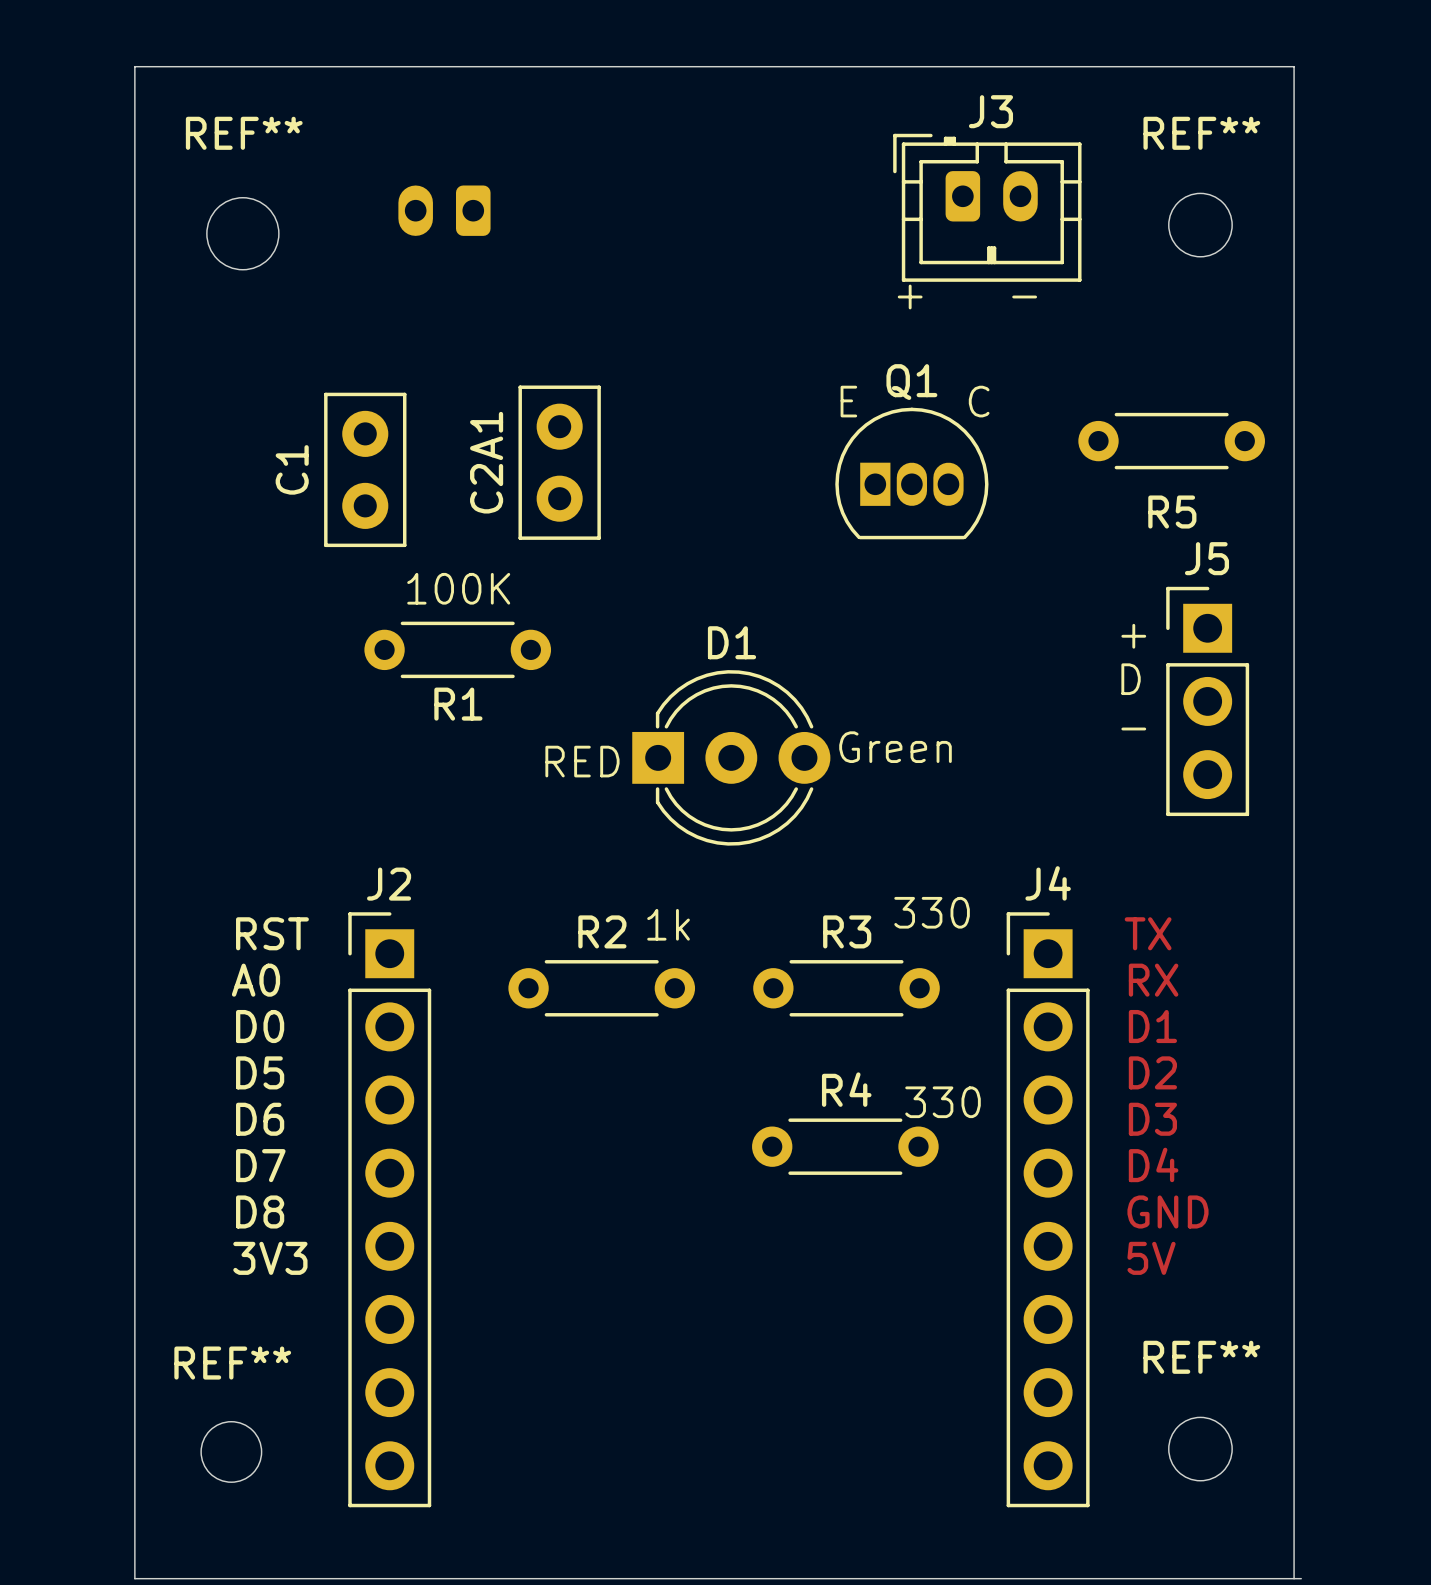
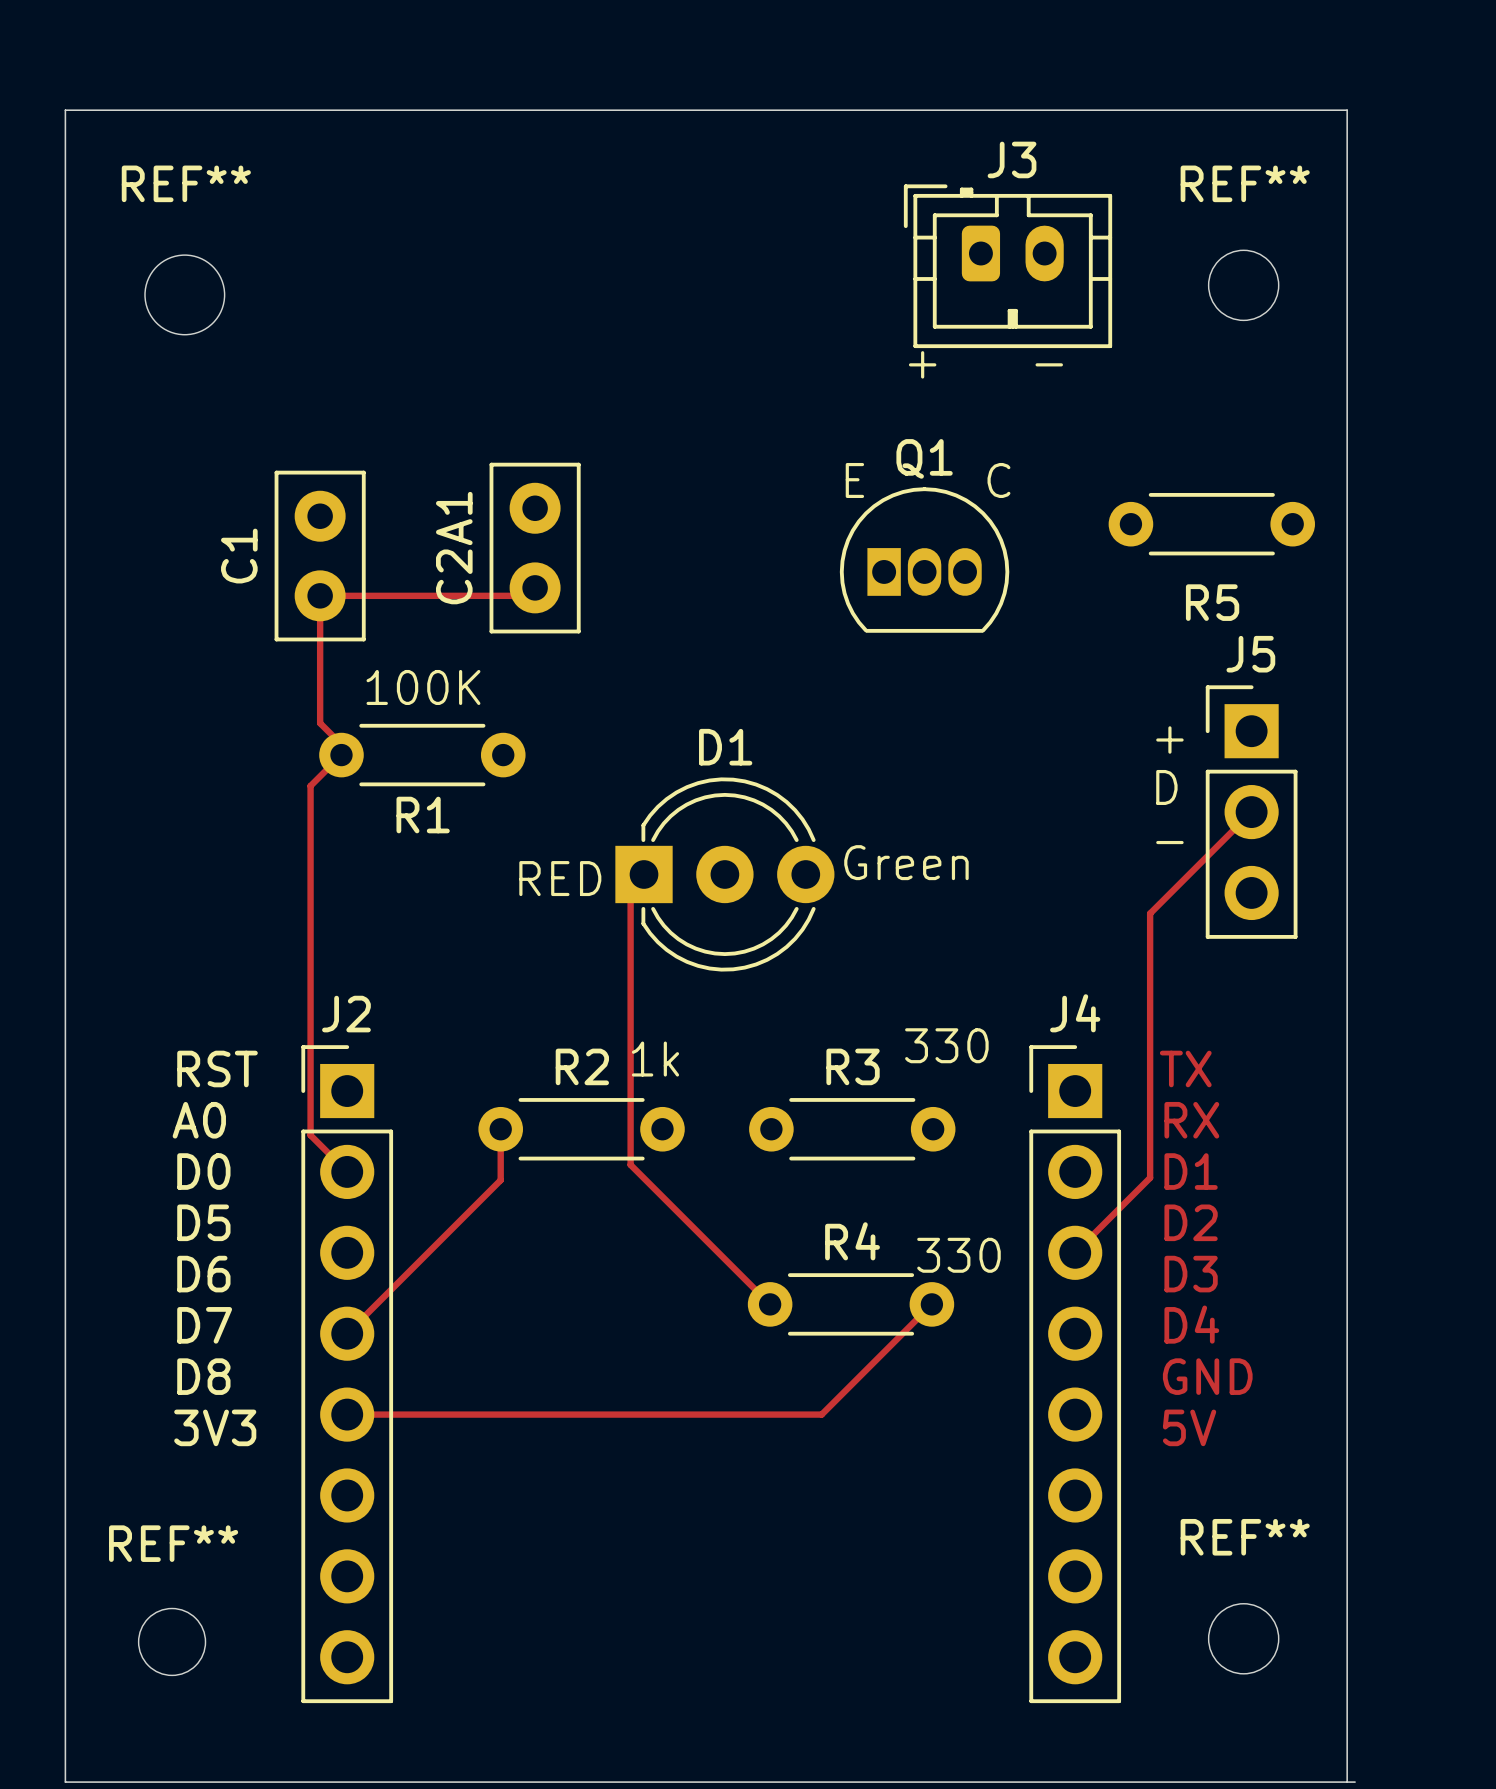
part: (444, 210) -> none
track: none -> (535, 587) (527, 595) (320, 595) (320, 723) (341, 744) (341, 755) (310, 785) (310, 1135) (347, 1171)
track: none -> (1251, 812) (1150, 913) (1150, 1177) (1075, 1252)
track: none -> (644, 874) (630, 887) (630, 1164) (770, 1304)
track: none -> (500, 1129) (500, 1180) (347, 1333)
track: none -> (931, 1304) (821, 1414) (347, 1414)

